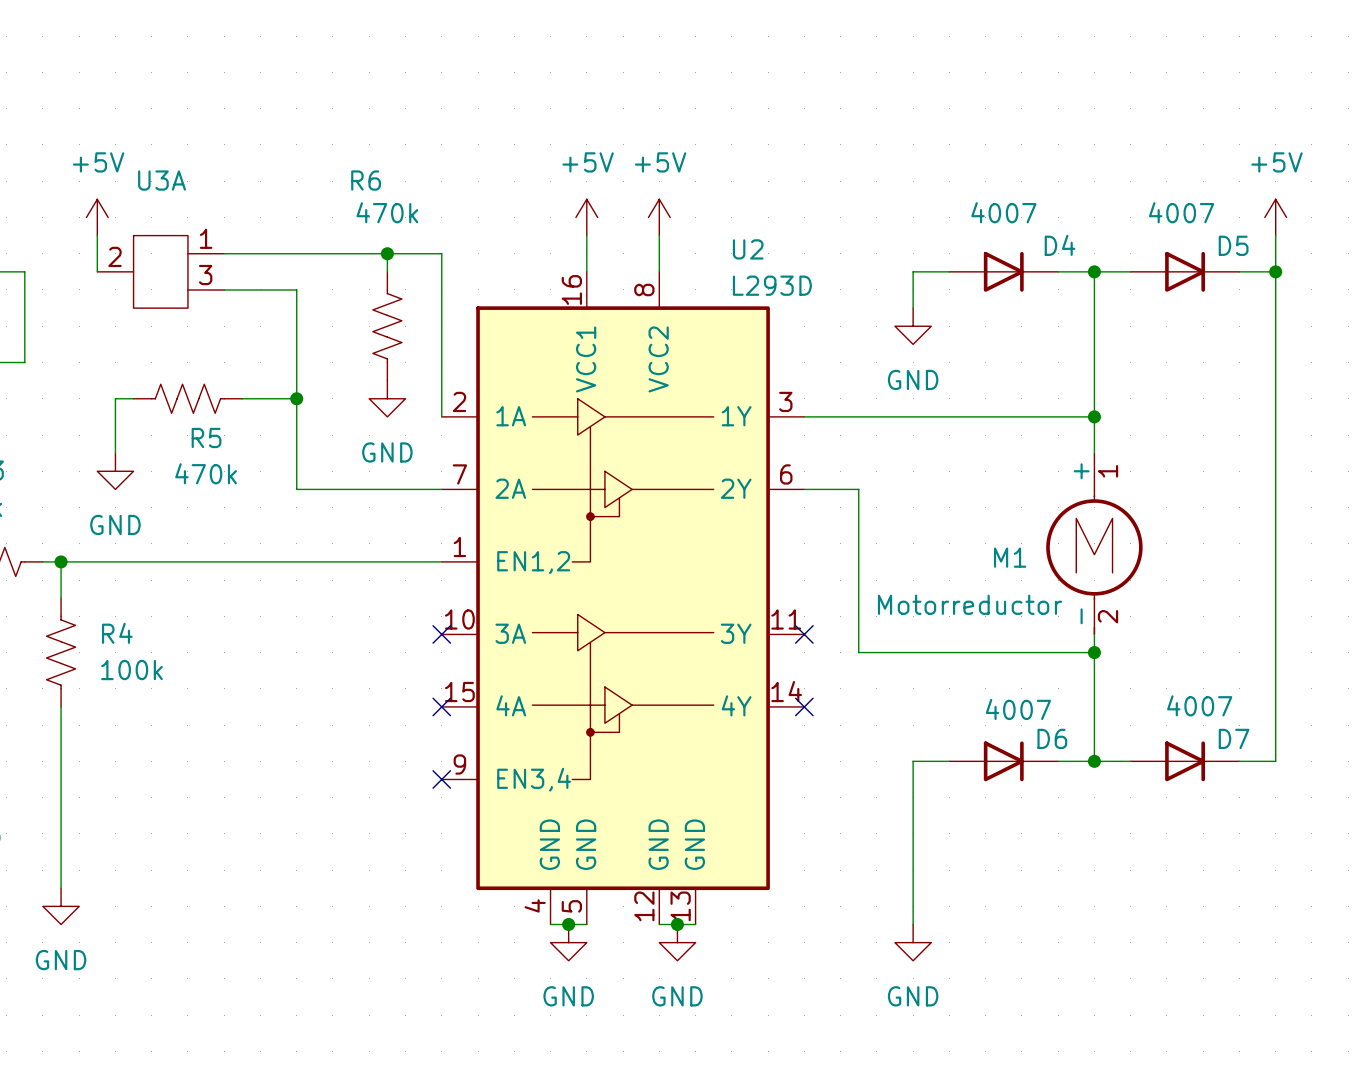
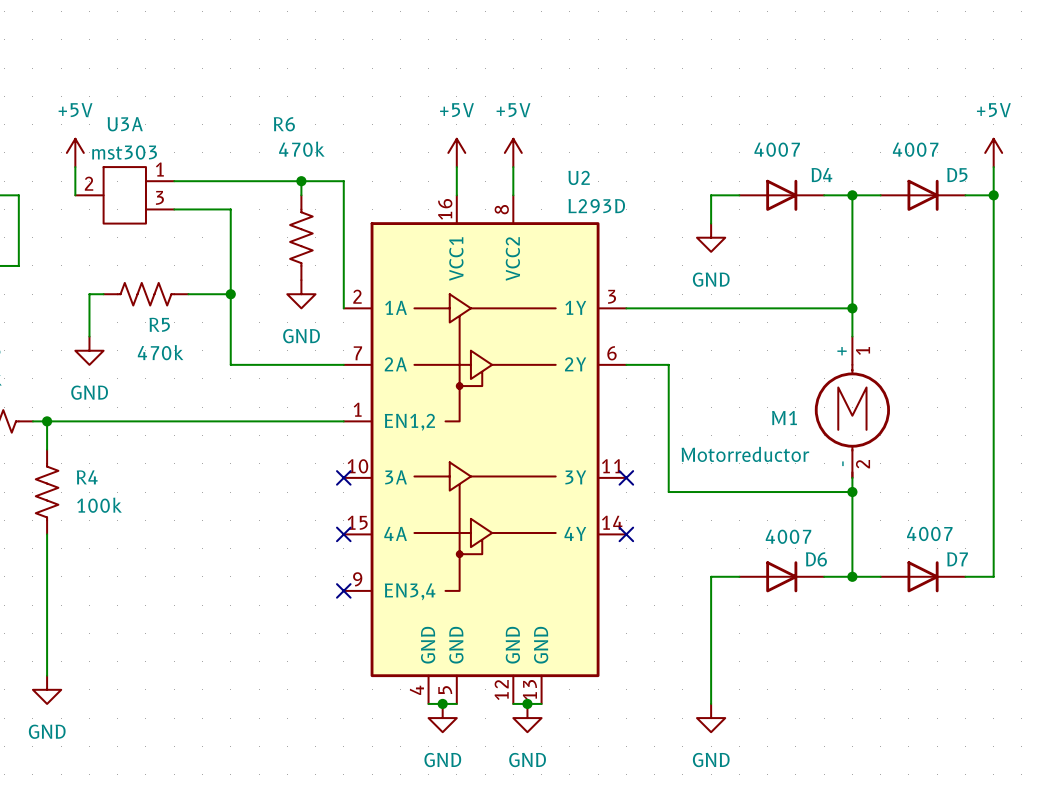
U3A value: none -> mst303 (124, 152)

